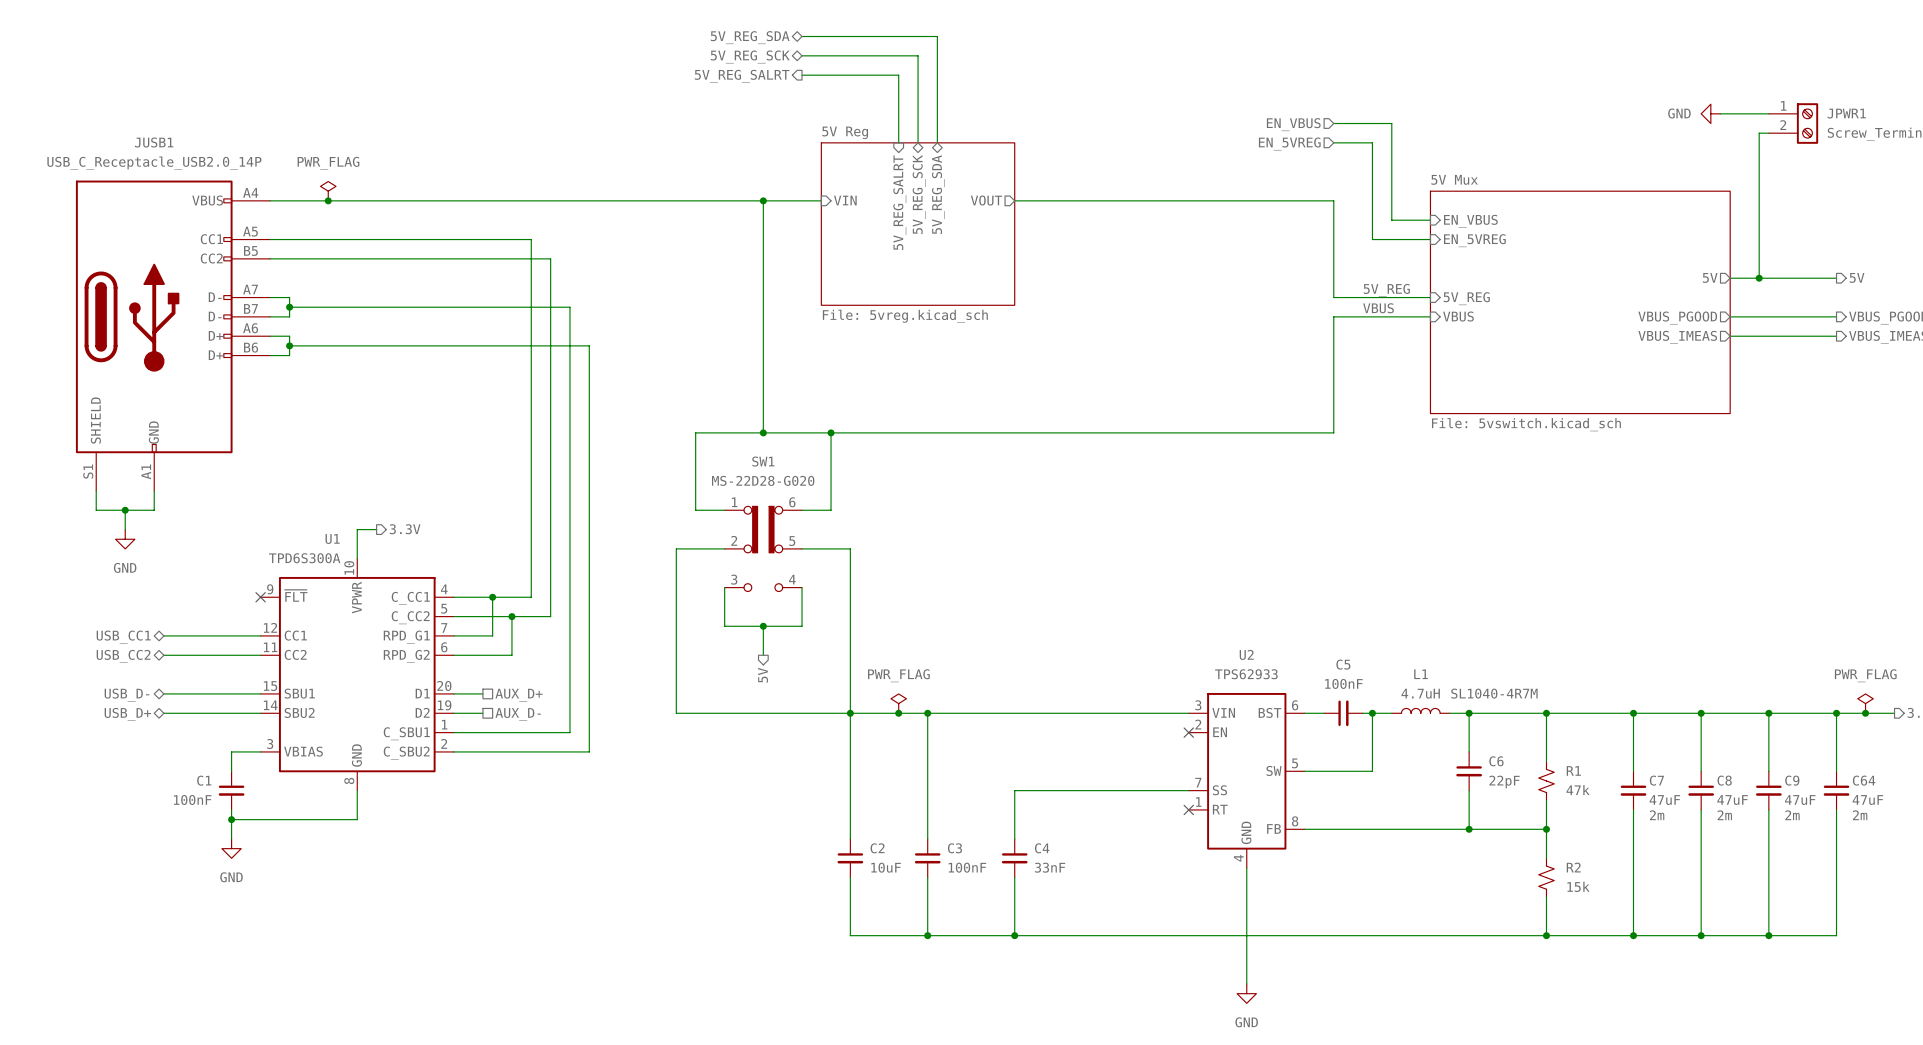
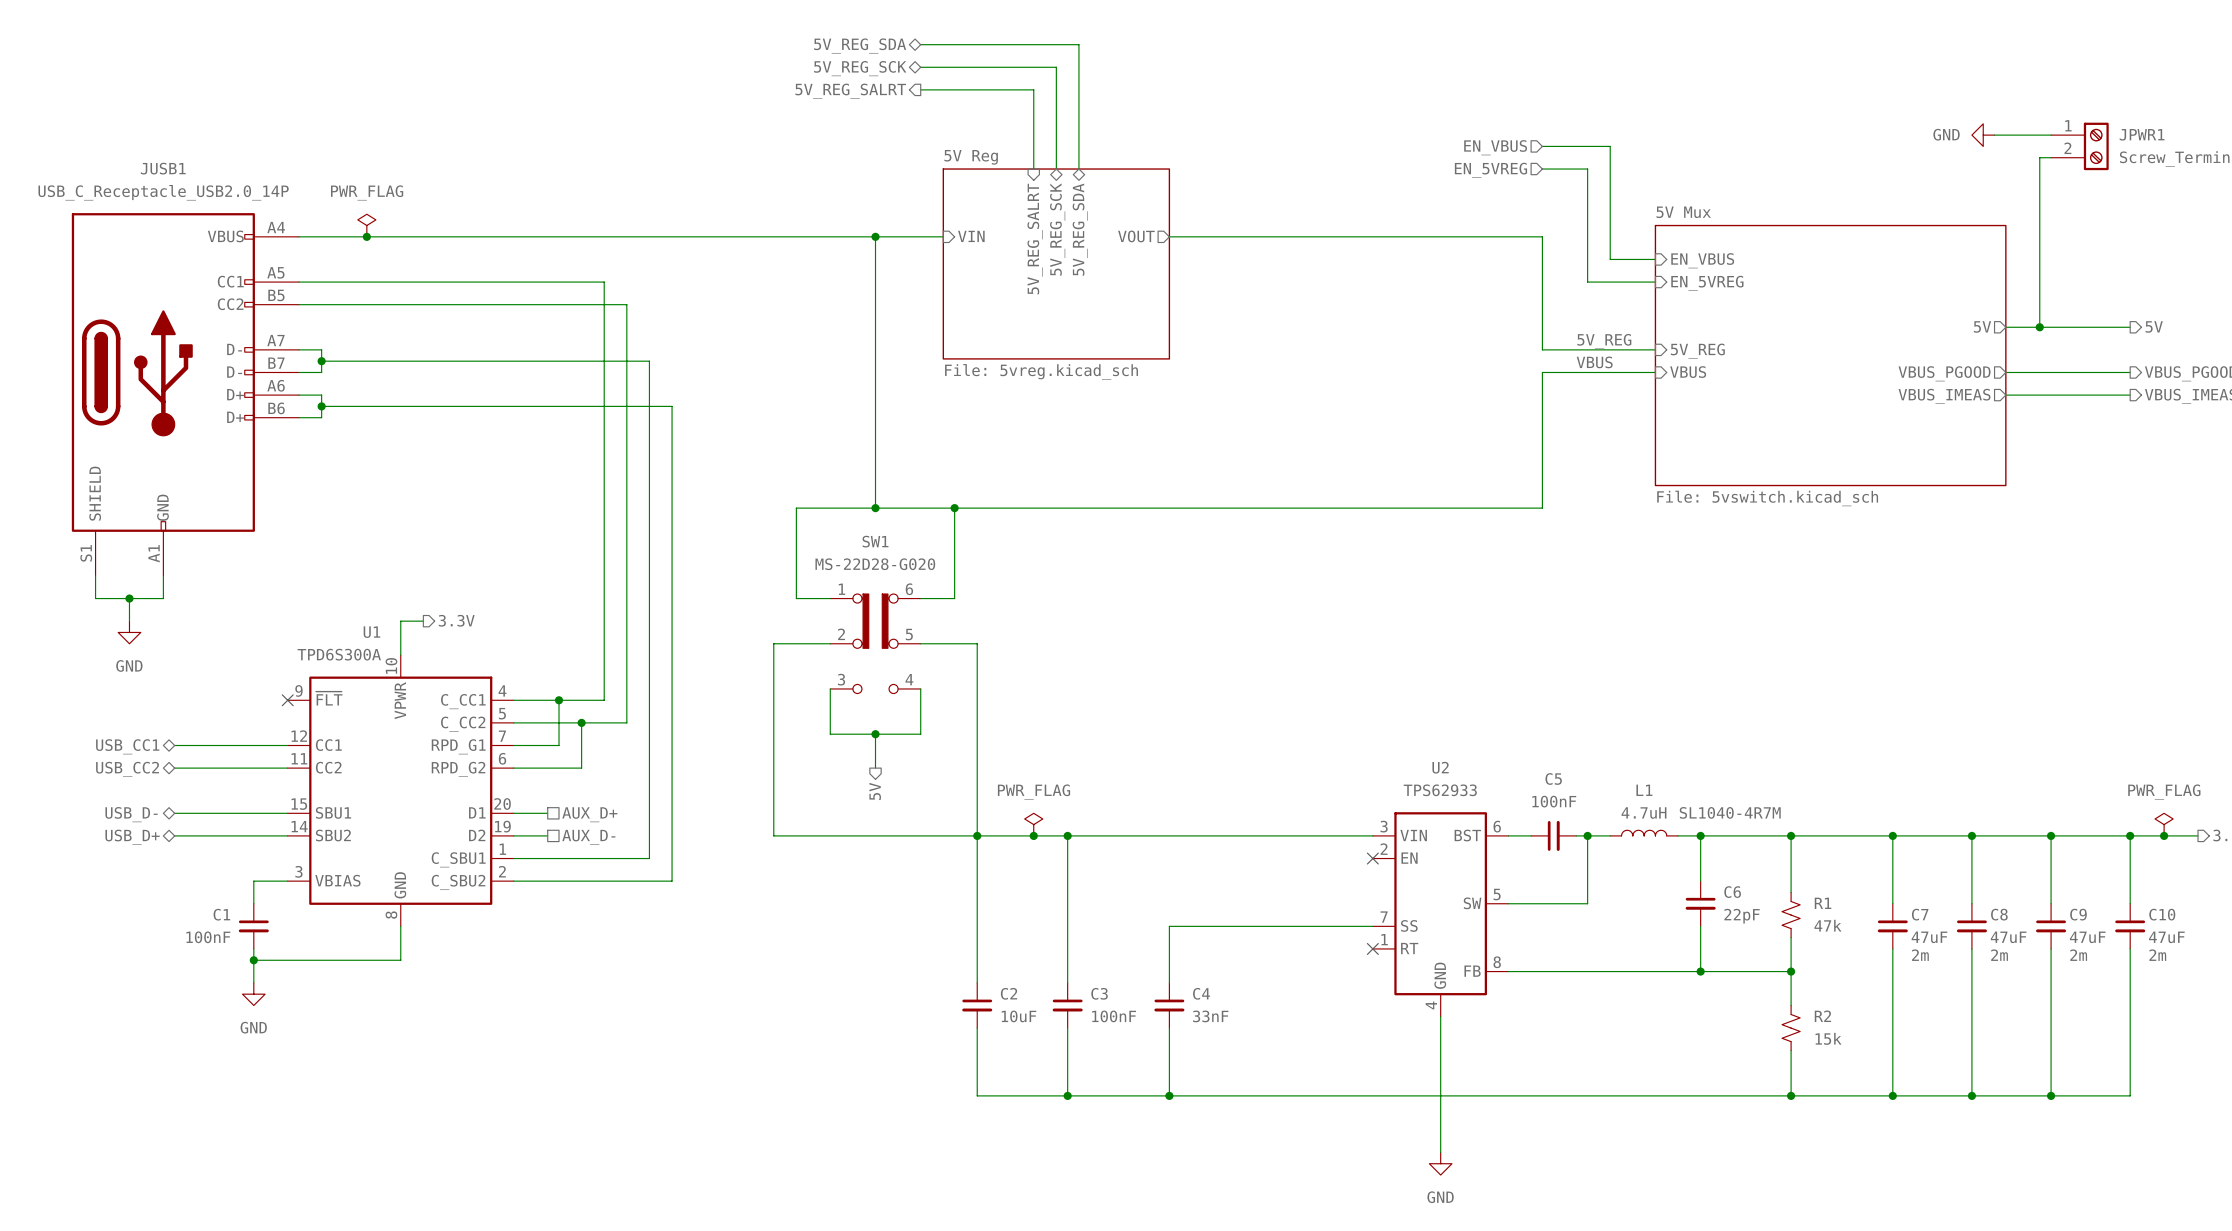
C64 name: C64 (1864, 780) -> C10 (2162, 914)

